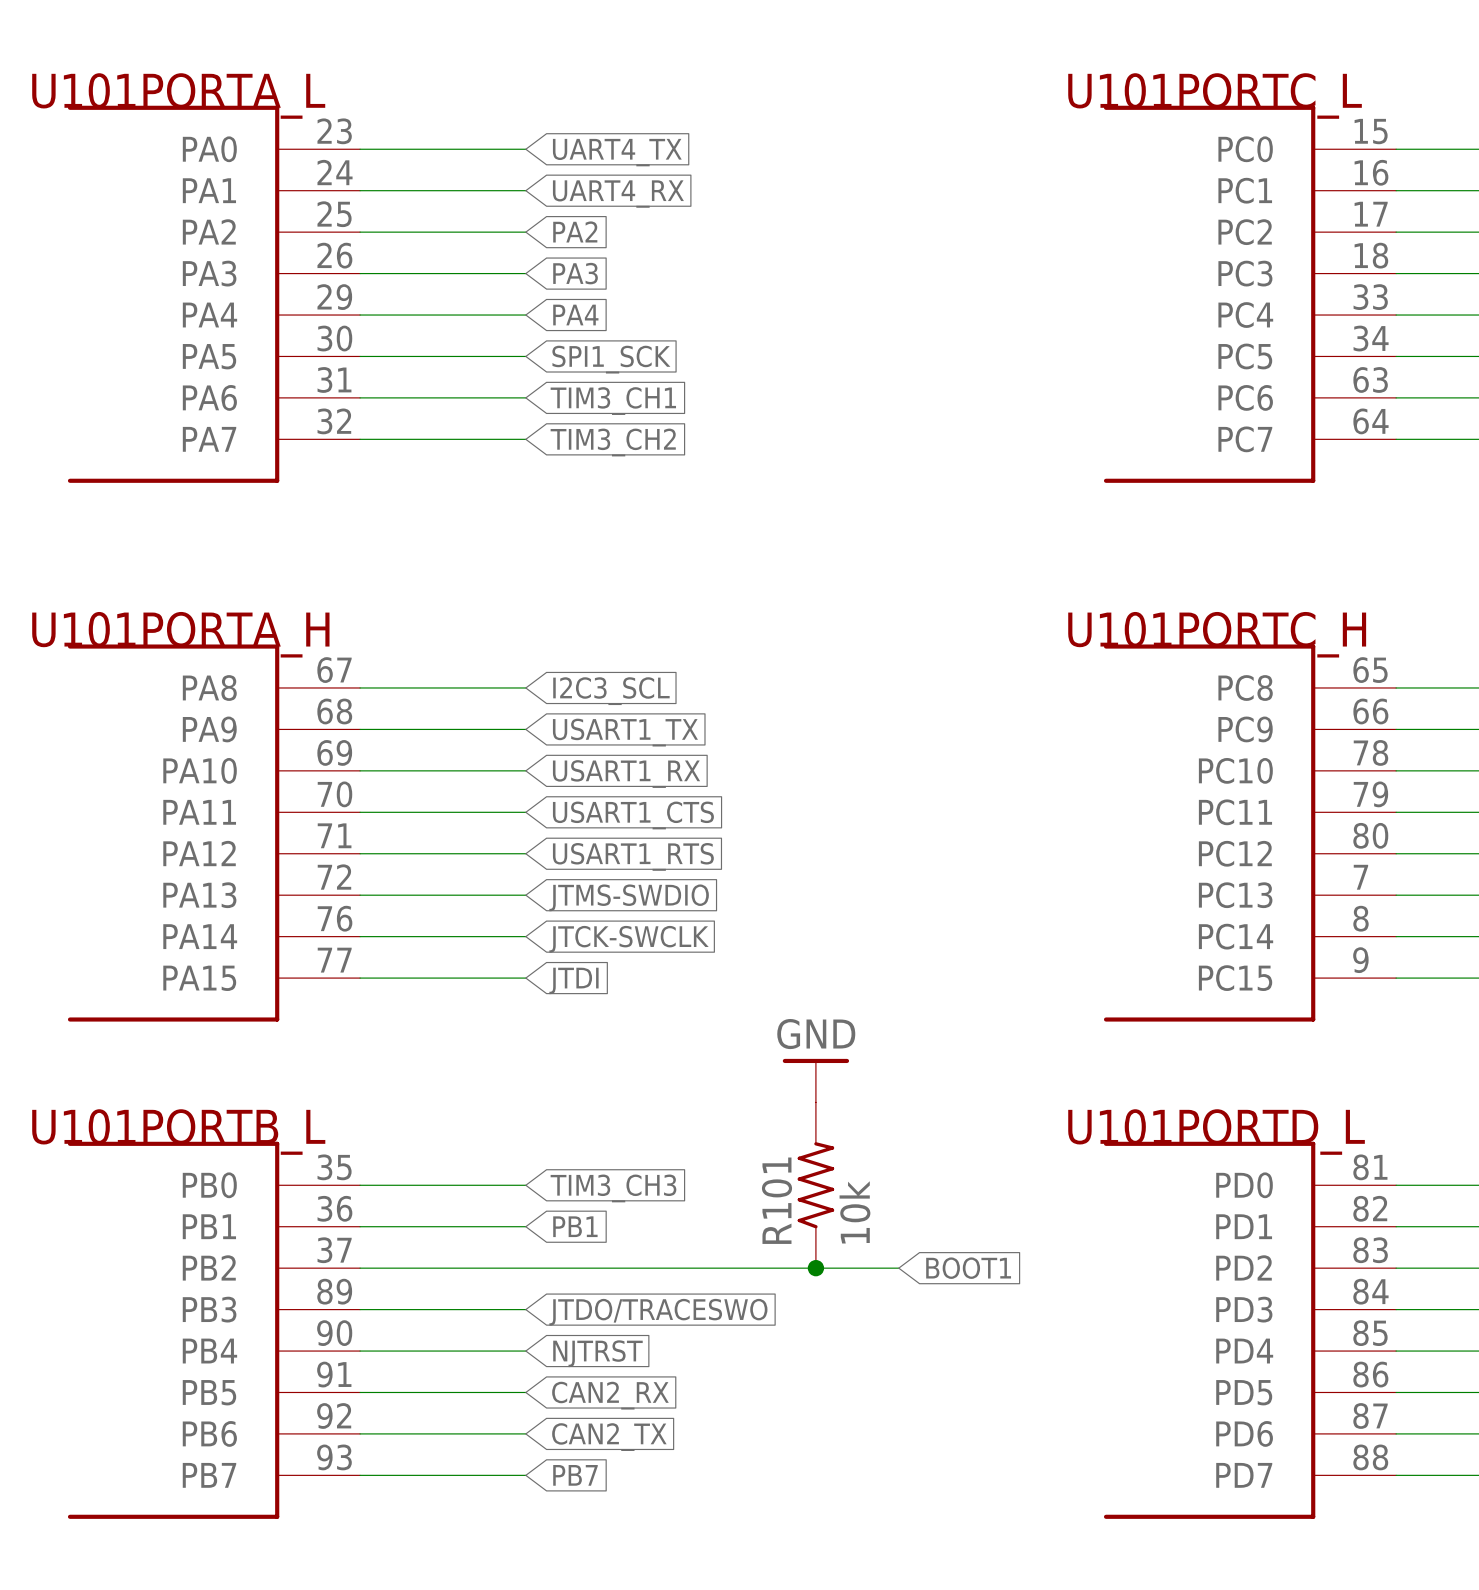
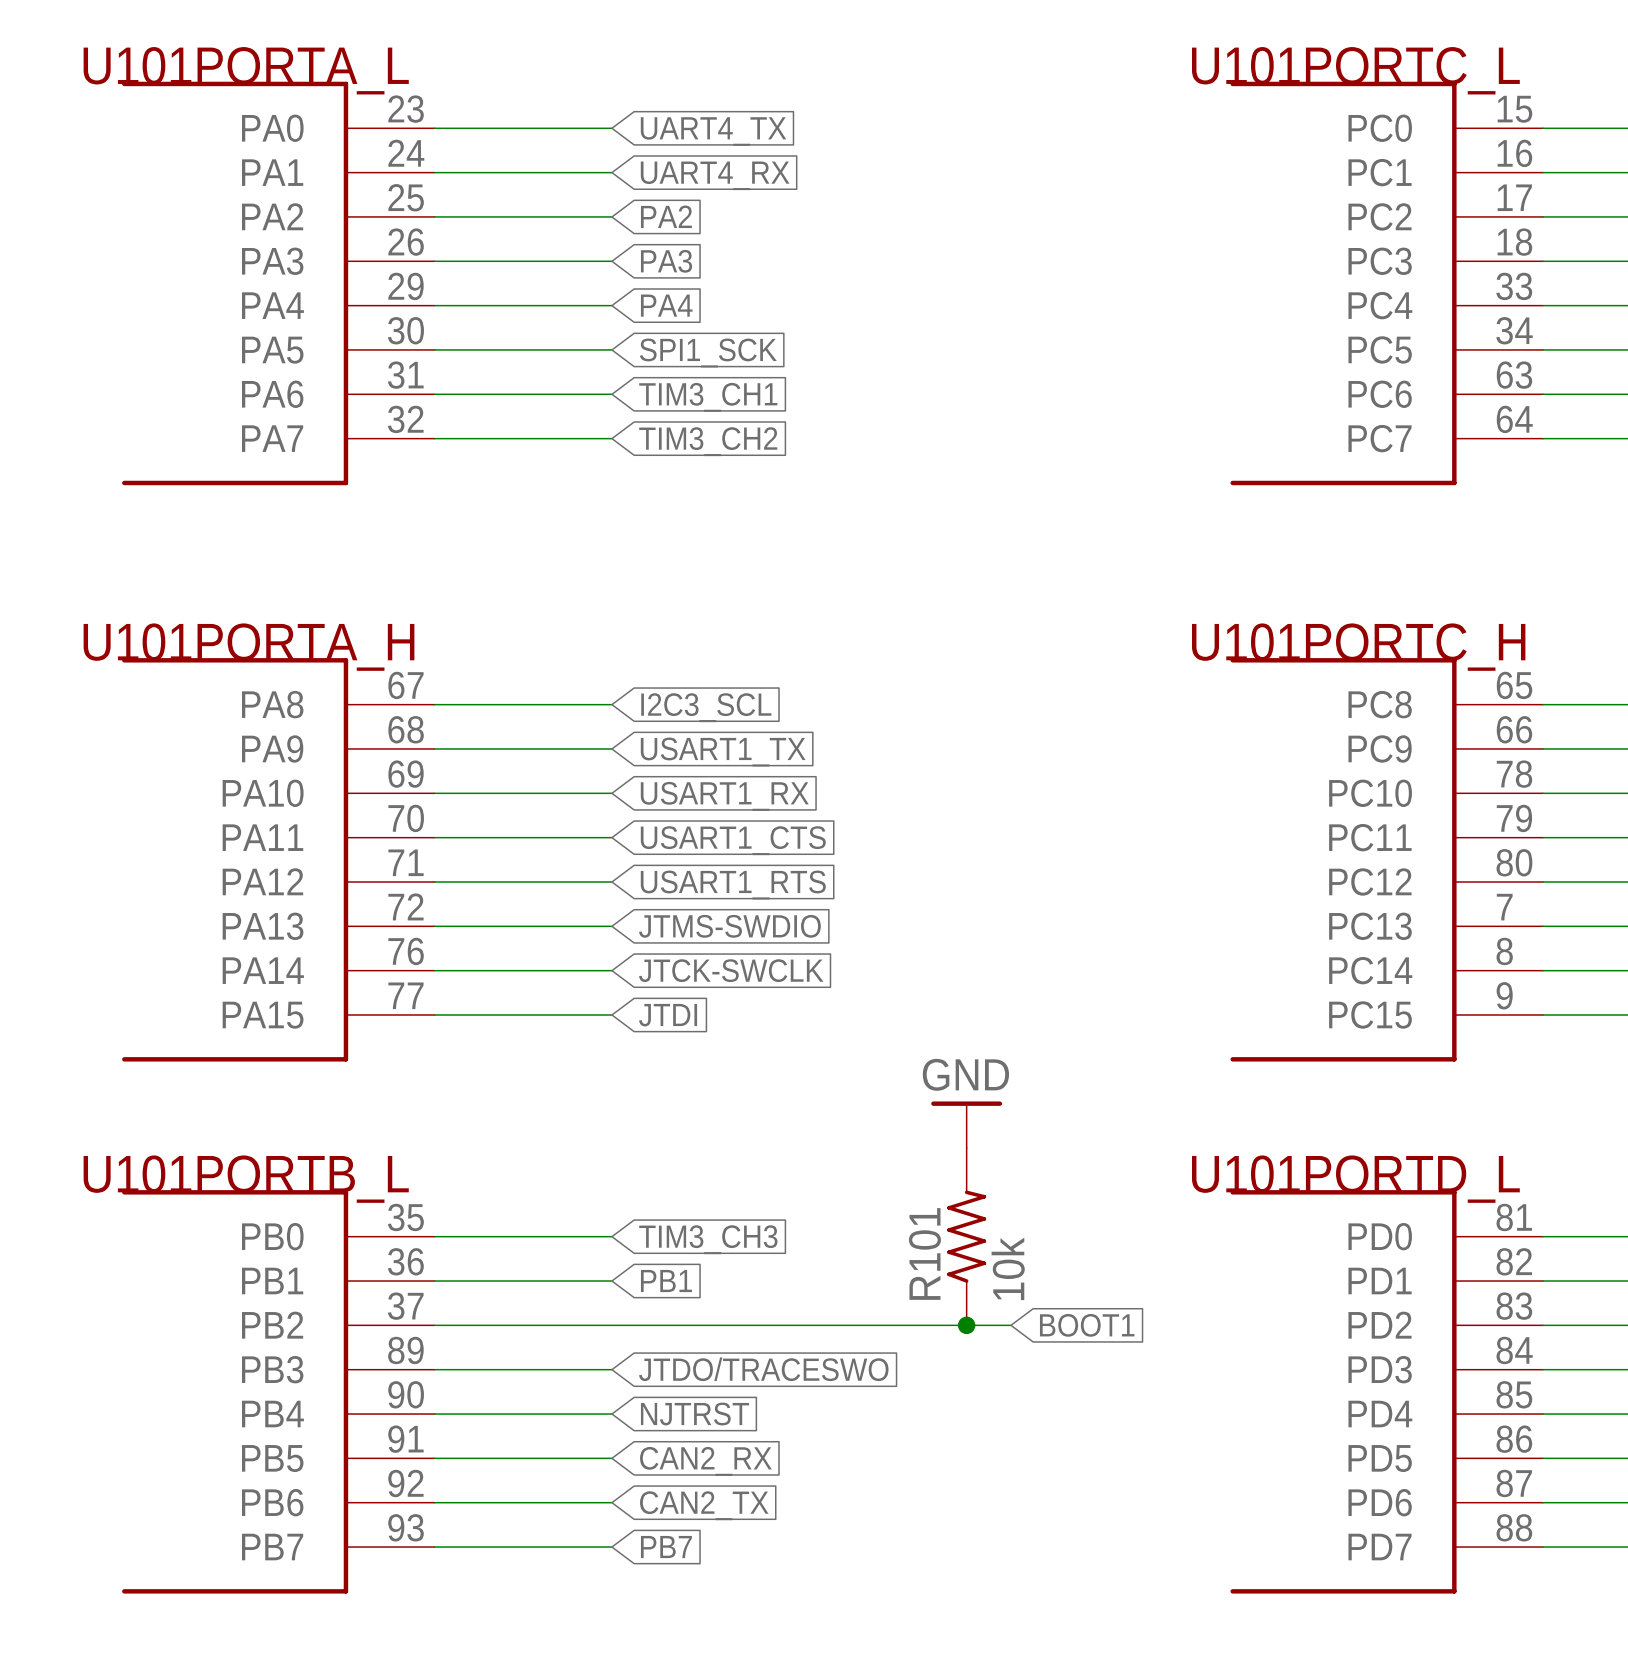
power symbol position: GND (815, 1080) -> GND (966, 1124)
R101 position: (815, 1185) -> (966, 1236)
junction position: (815, 1268) -> (966, 1325)

